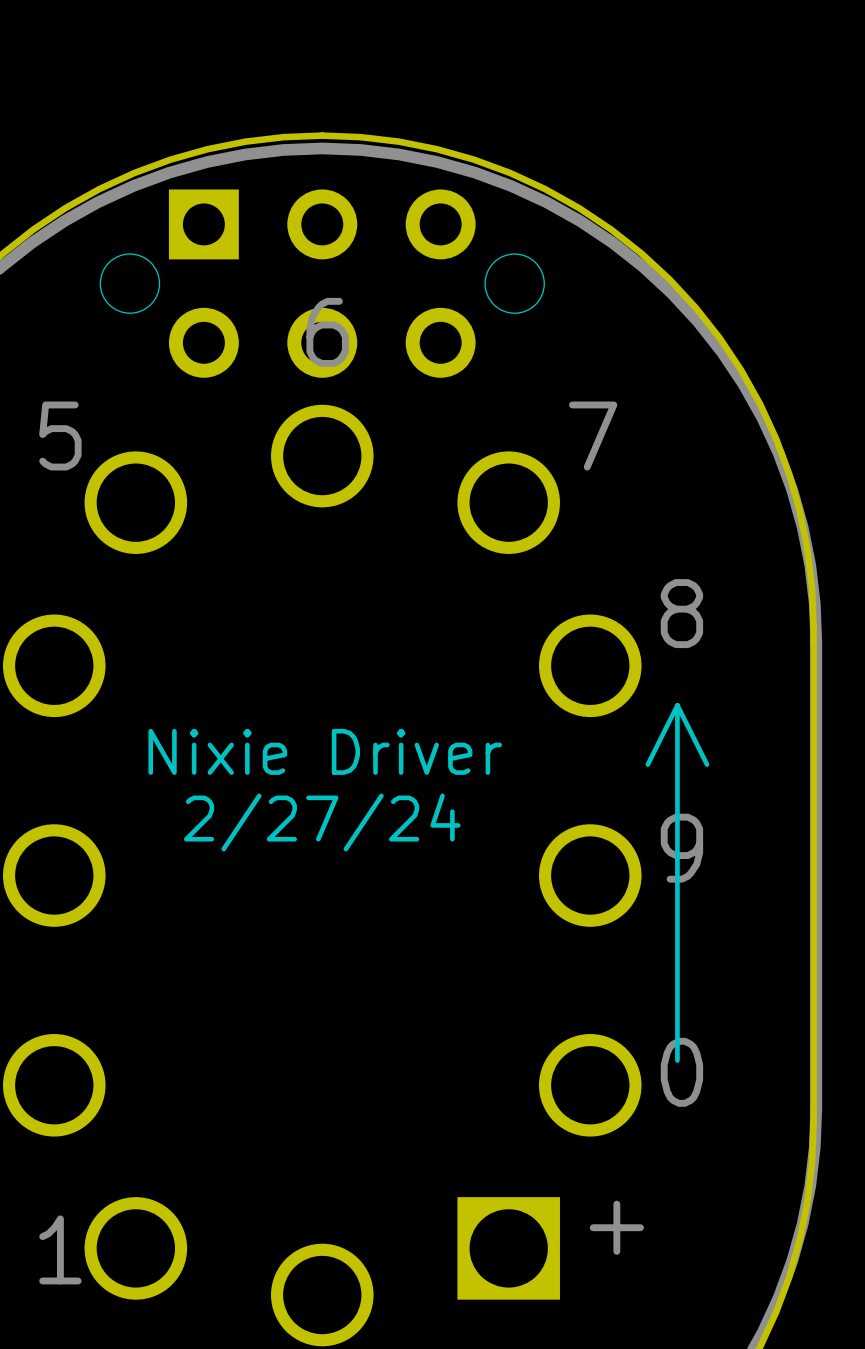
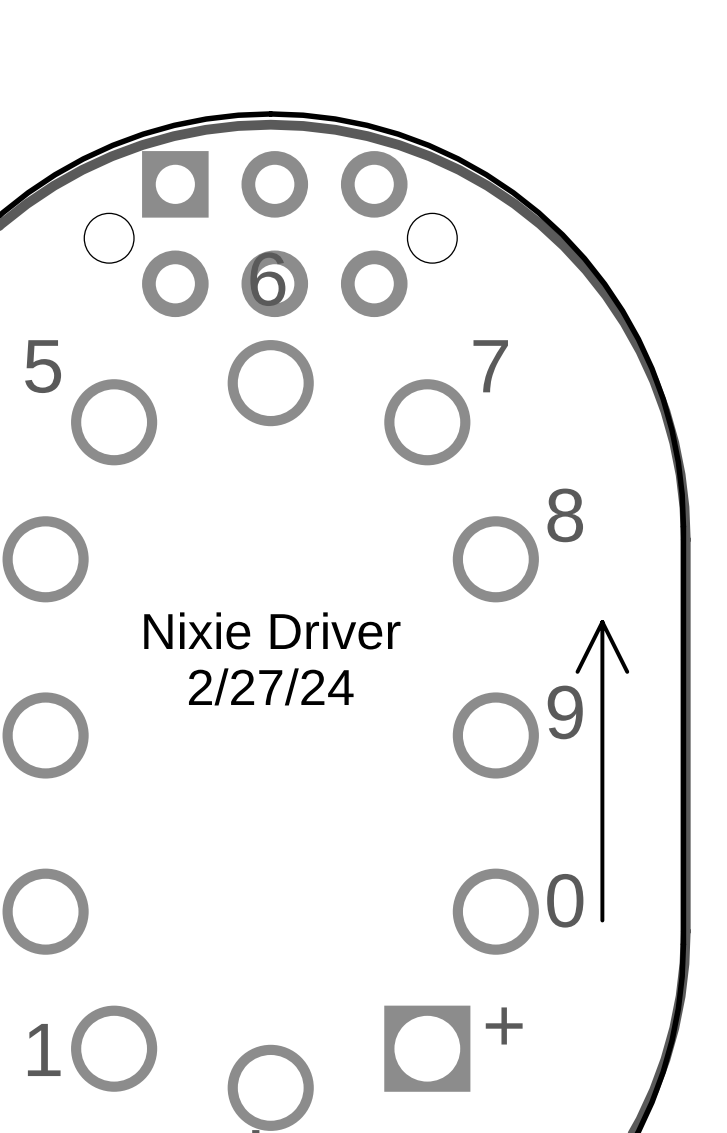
part footprint: [168, 189, 476, 378] -> [142, 151, 408, 318]
line: (677, 705) (647, 764) -> (602, 622) (577, 671)
line: (677, 705) (707, 764) -> (602, 622) (627, 671)
line: (677, 705) (677, 1060) -> (602, 622) (602, 920)

